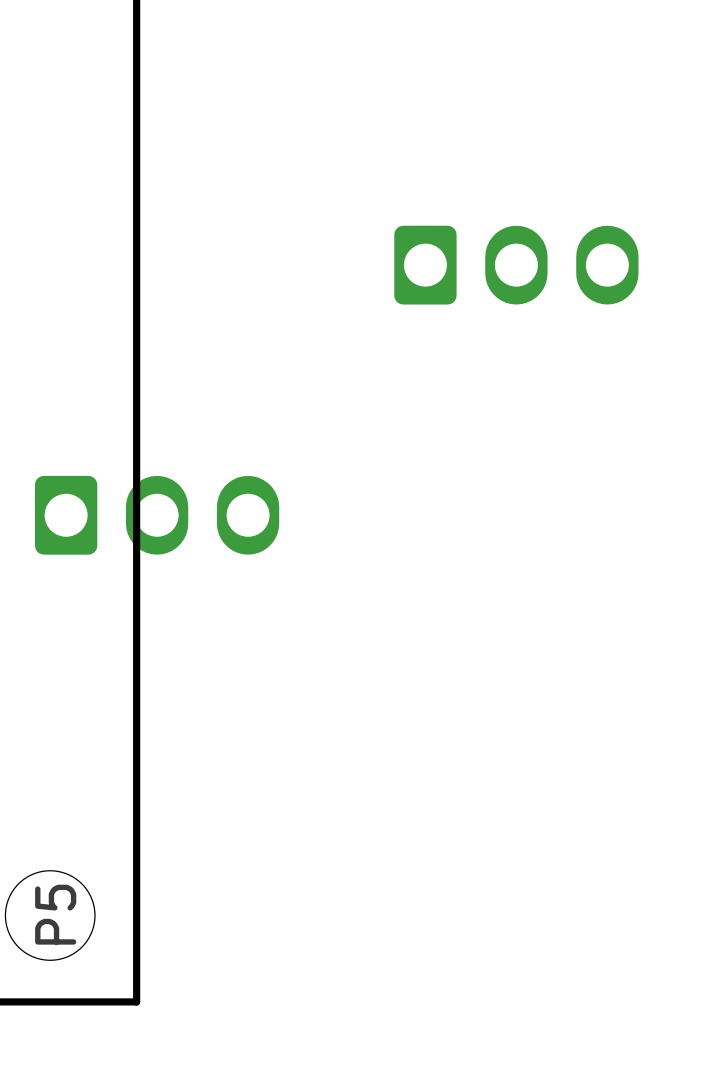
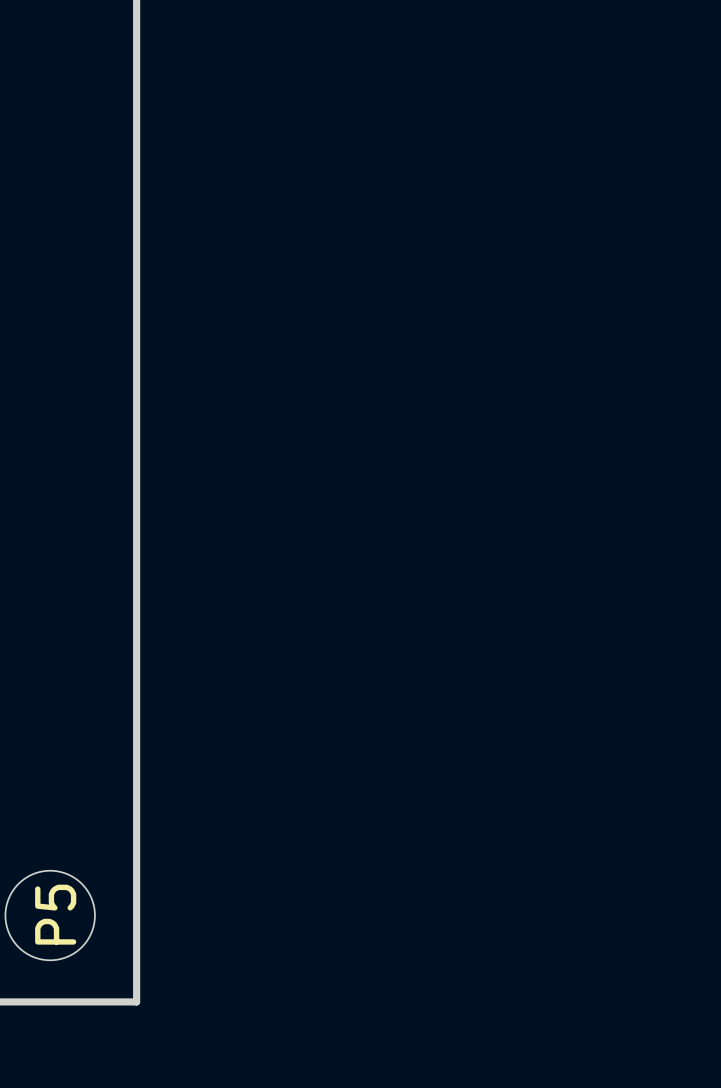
part: (516, 265) -> none
part: (157, 515) -> none

